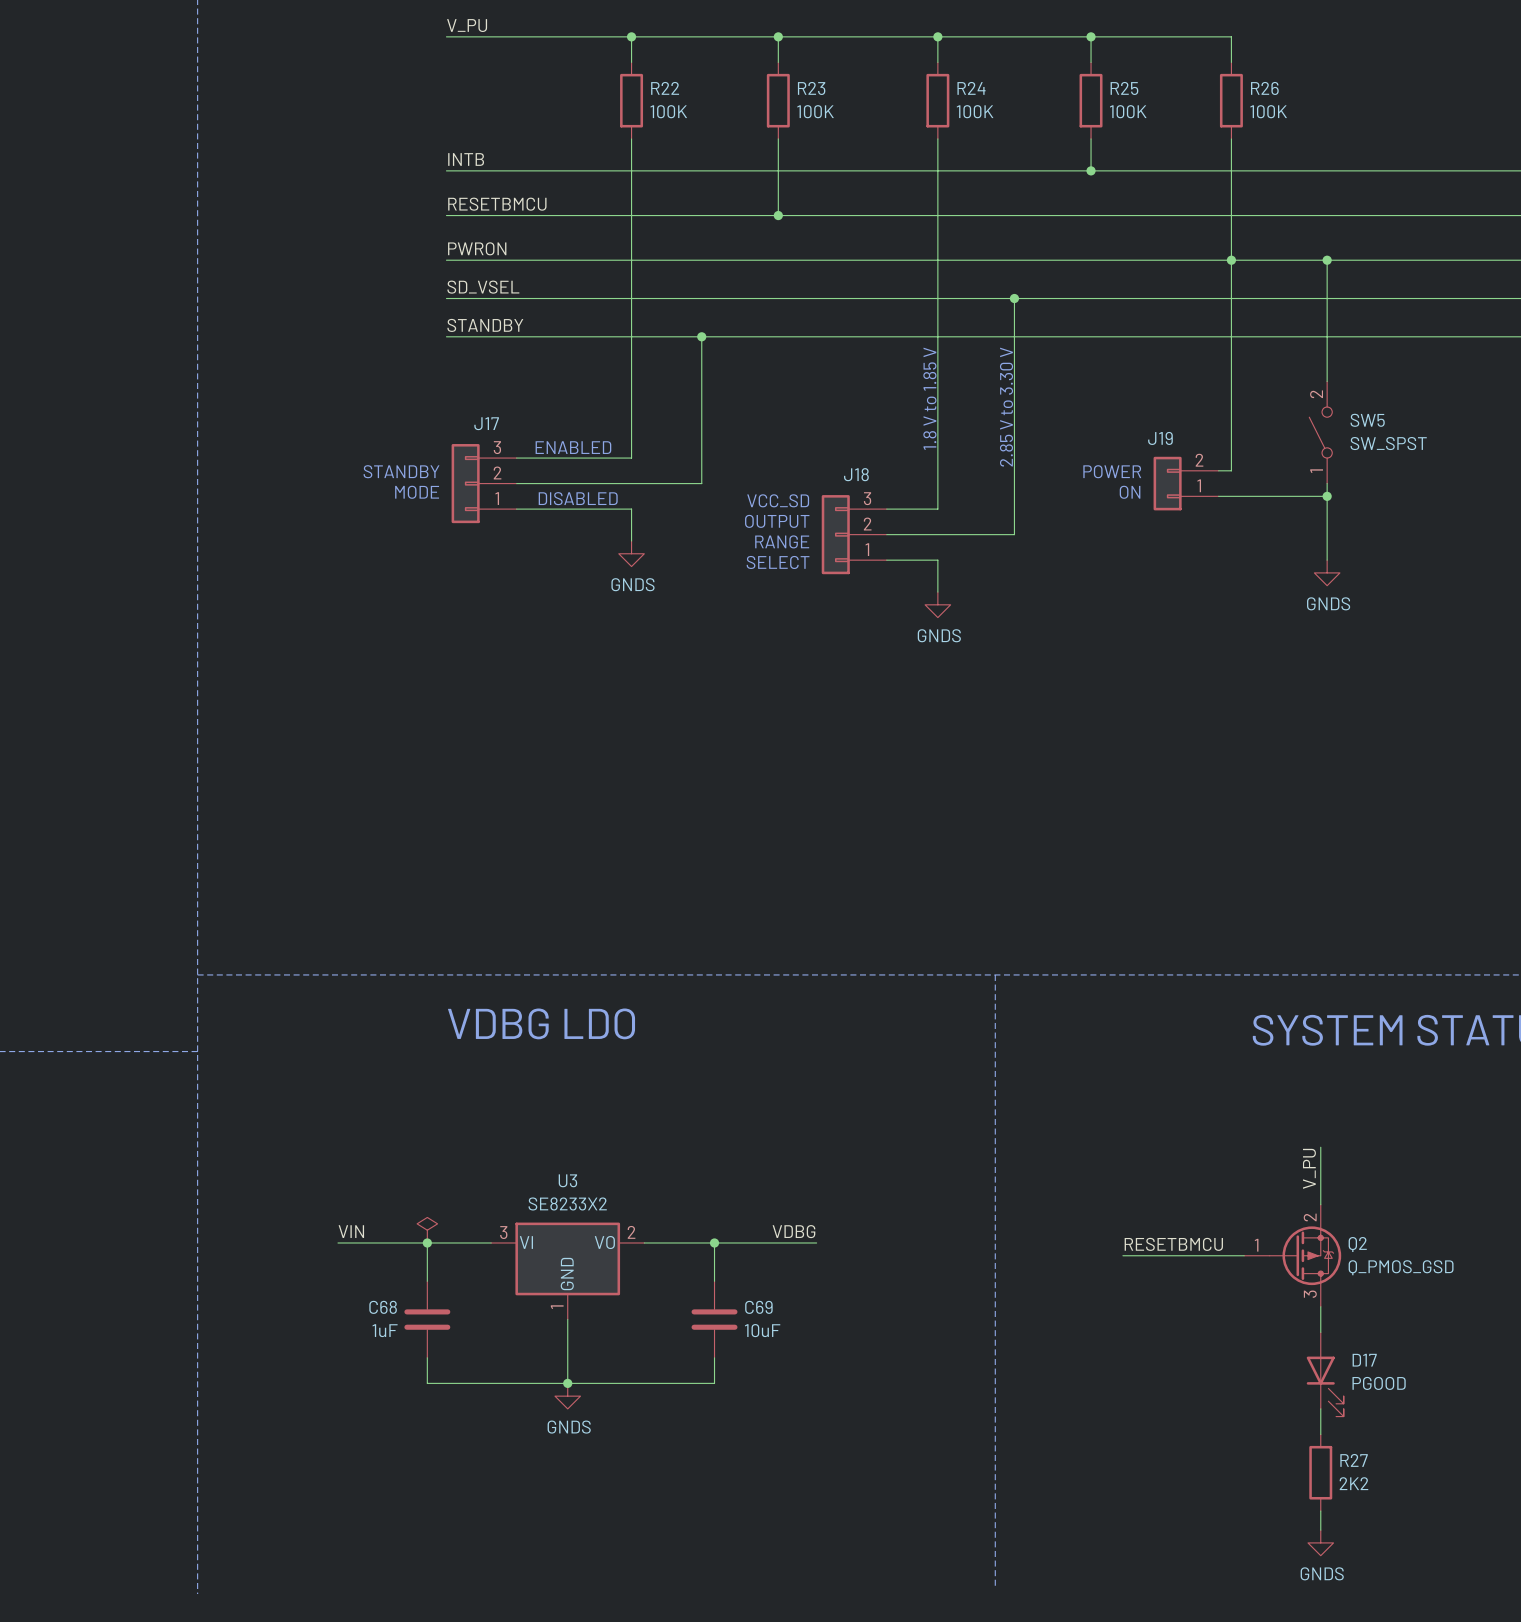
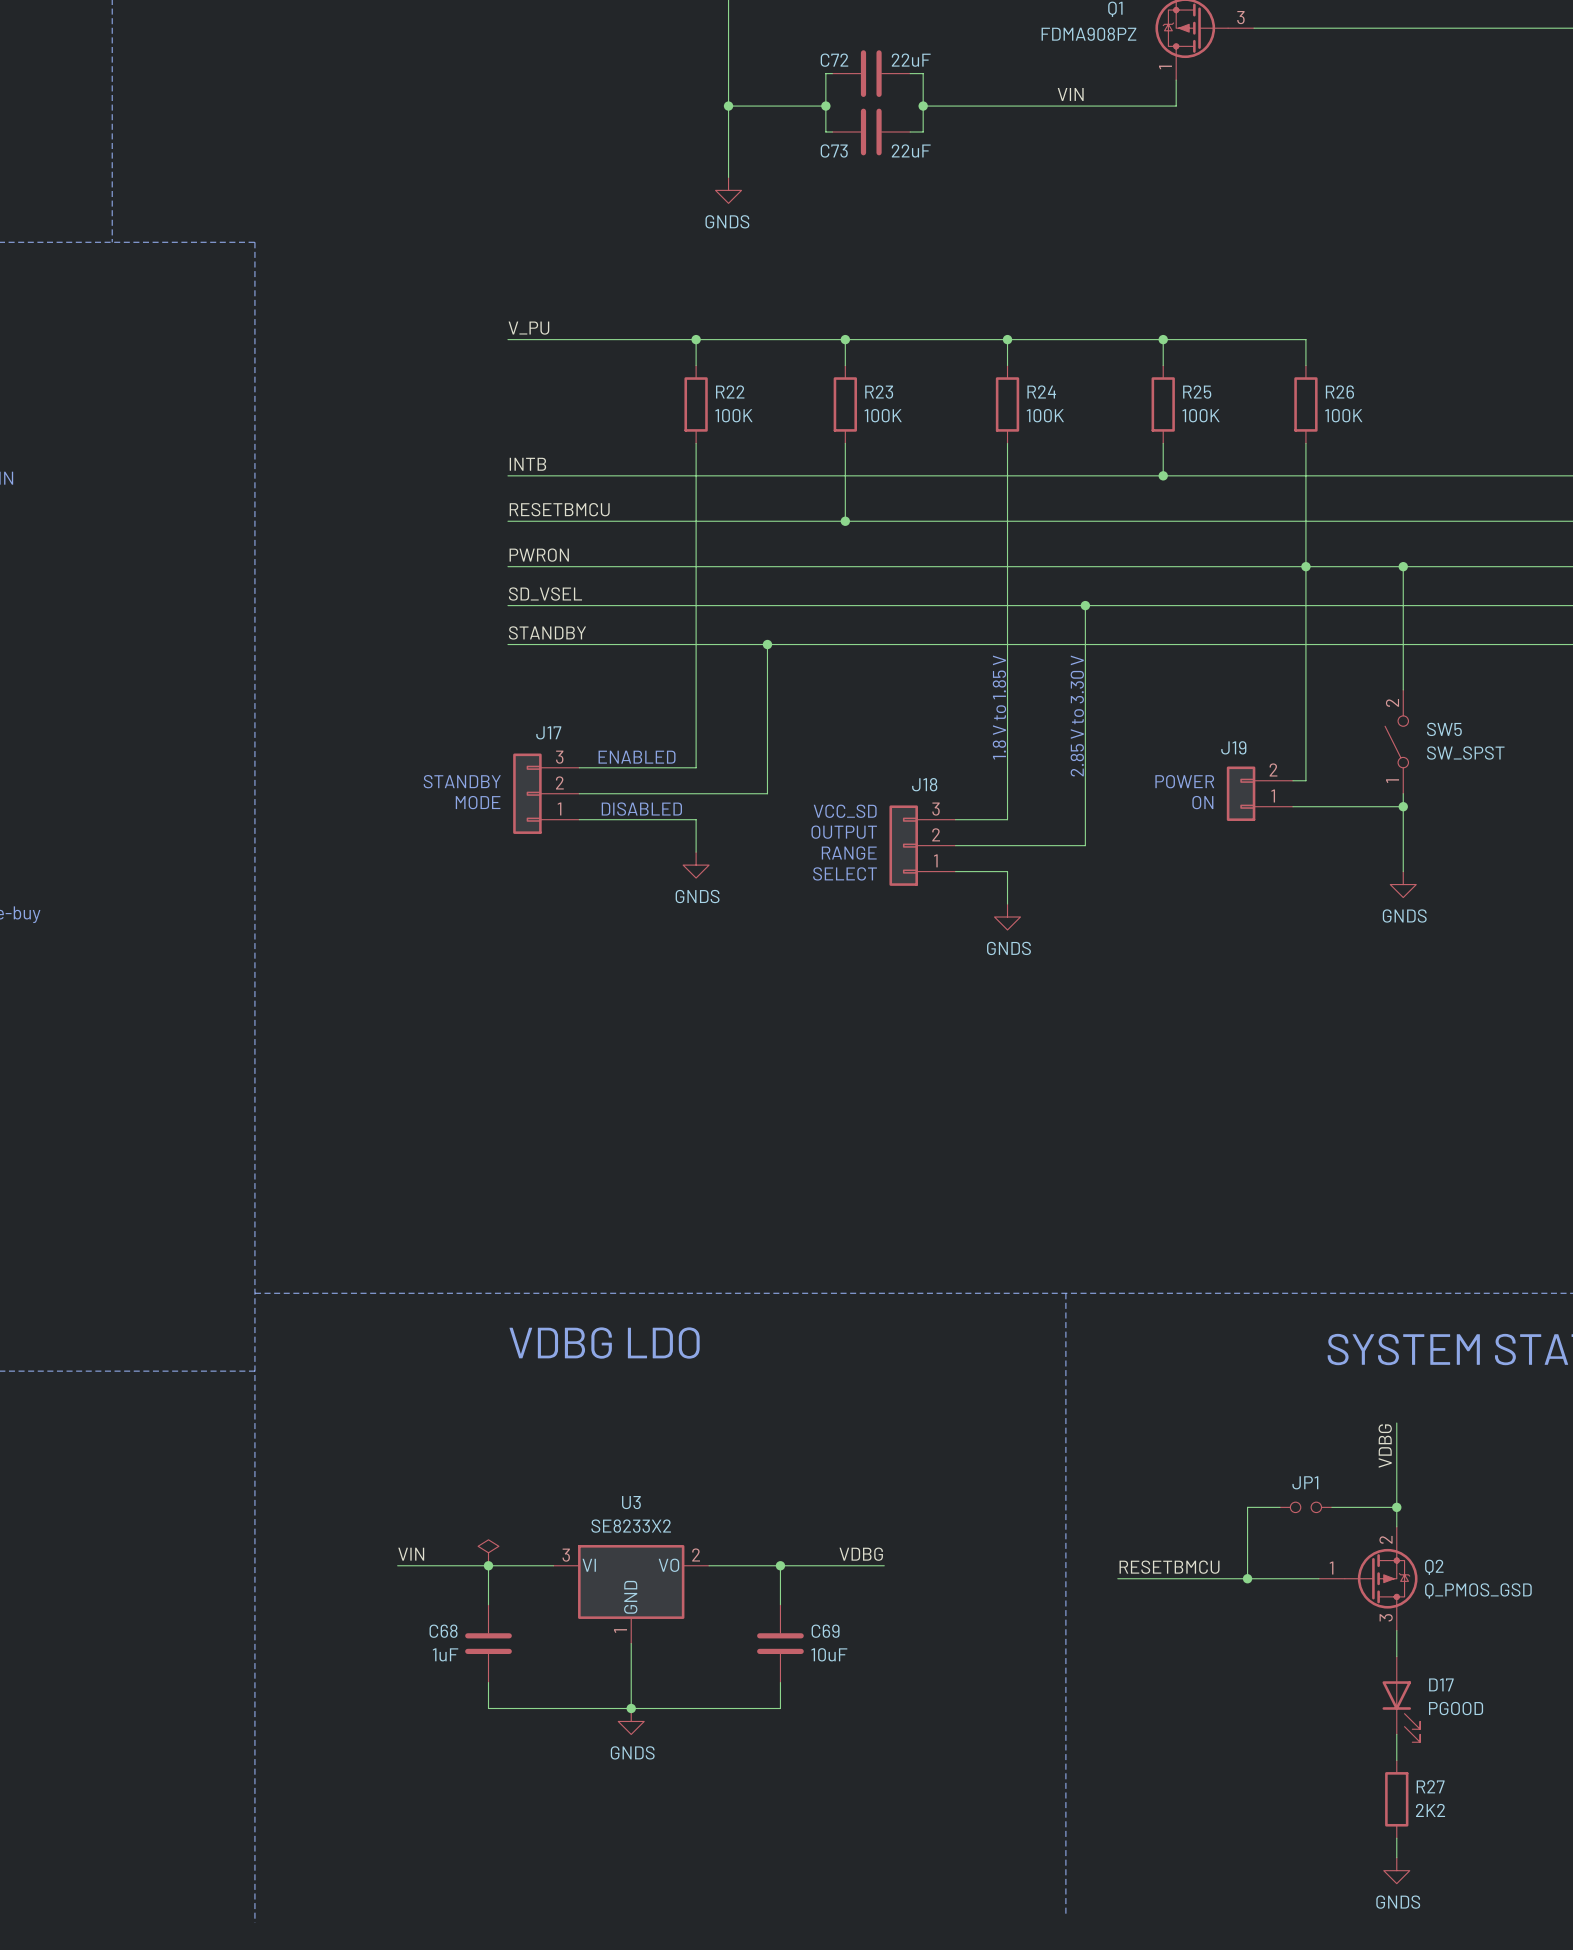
wire: none -> (1396, 1423) (1396, 1468)
label: none -> VDBG (1385, 1446)
label: V_PU (1309, 1168) -> none
wire: none -> (1279, 1507) (1247, 1507) (1247, 1578)
JP1: none -> (1305, 1507)
wire: none -> (1331, 1507) (1396, 1507)
junction: none -> (1396, 1507)
label position: RESETBMCU (1173, 1244) -> RESETBMCU (1169, 1567)
wire: none -> (1117, 1578) (1195, 1578)
junction: none -> (1247, 1578)

